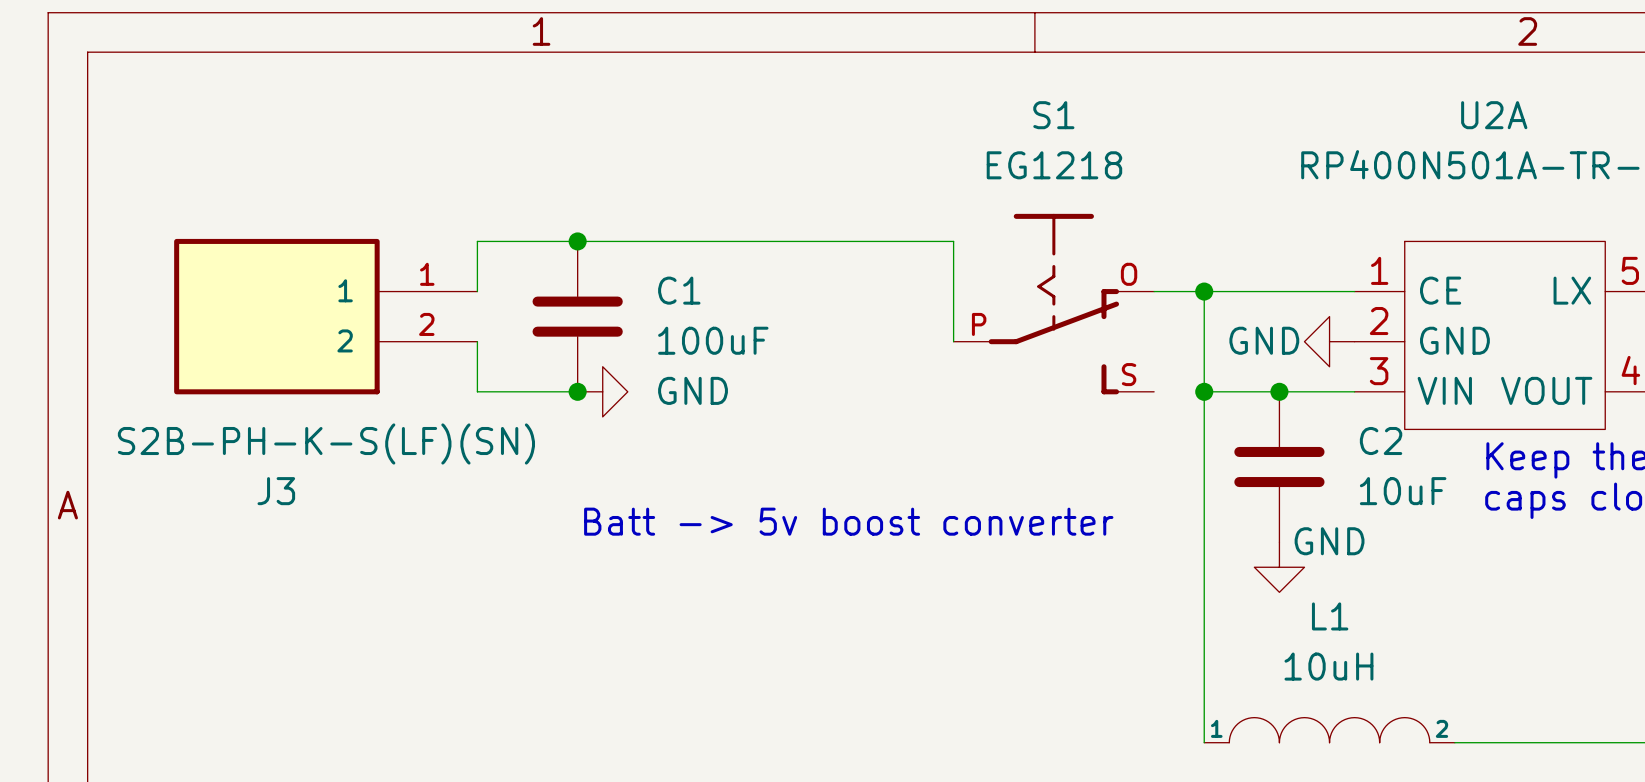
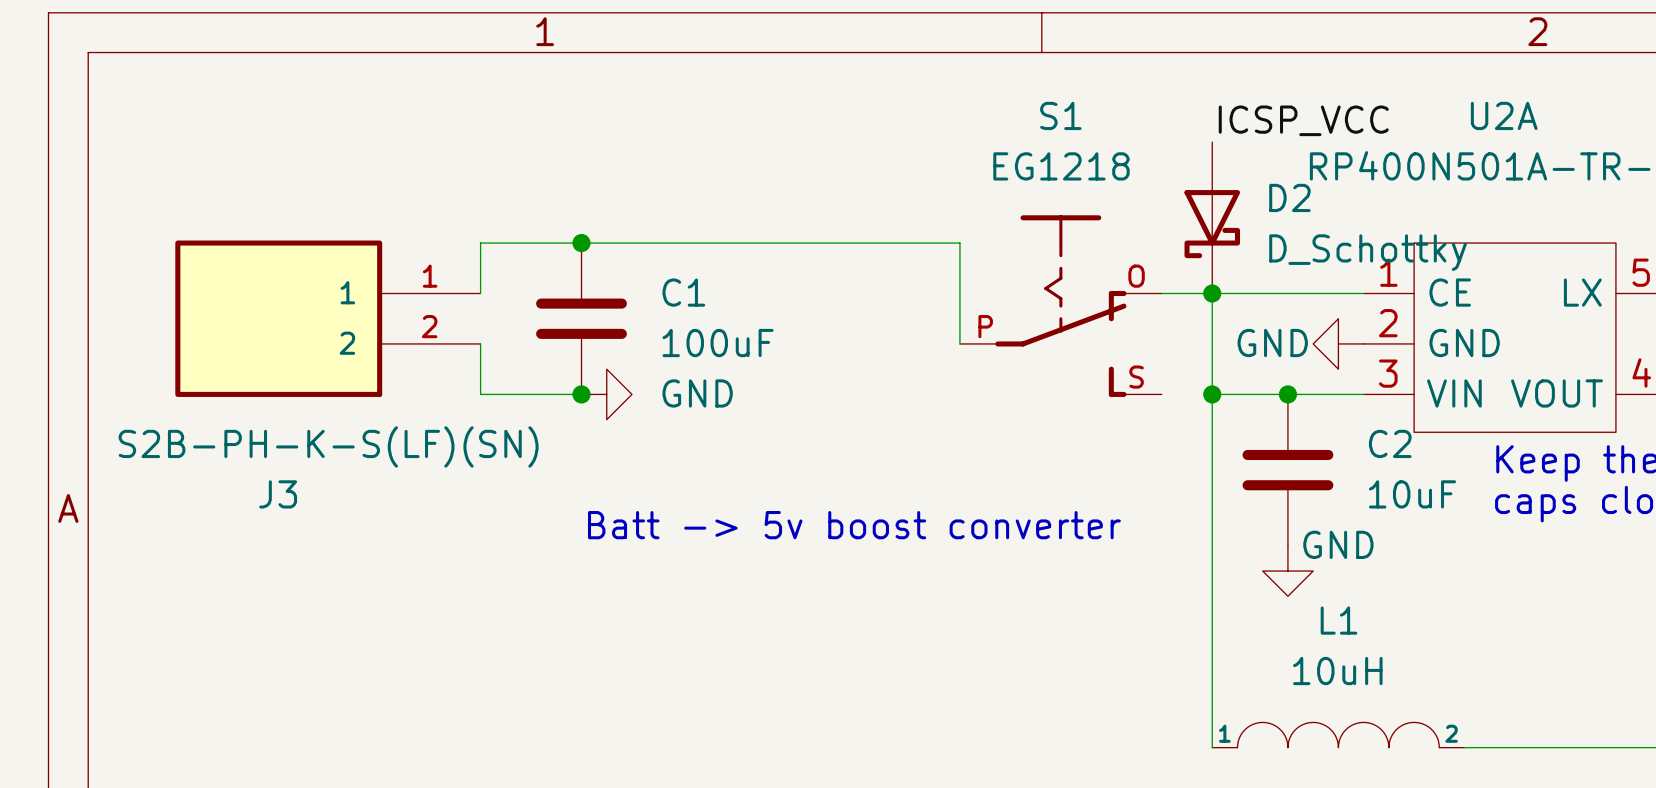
label: none -> ICSP_VCC (1303, 120)
D2: none -> D_Schottky (1212, 217)

